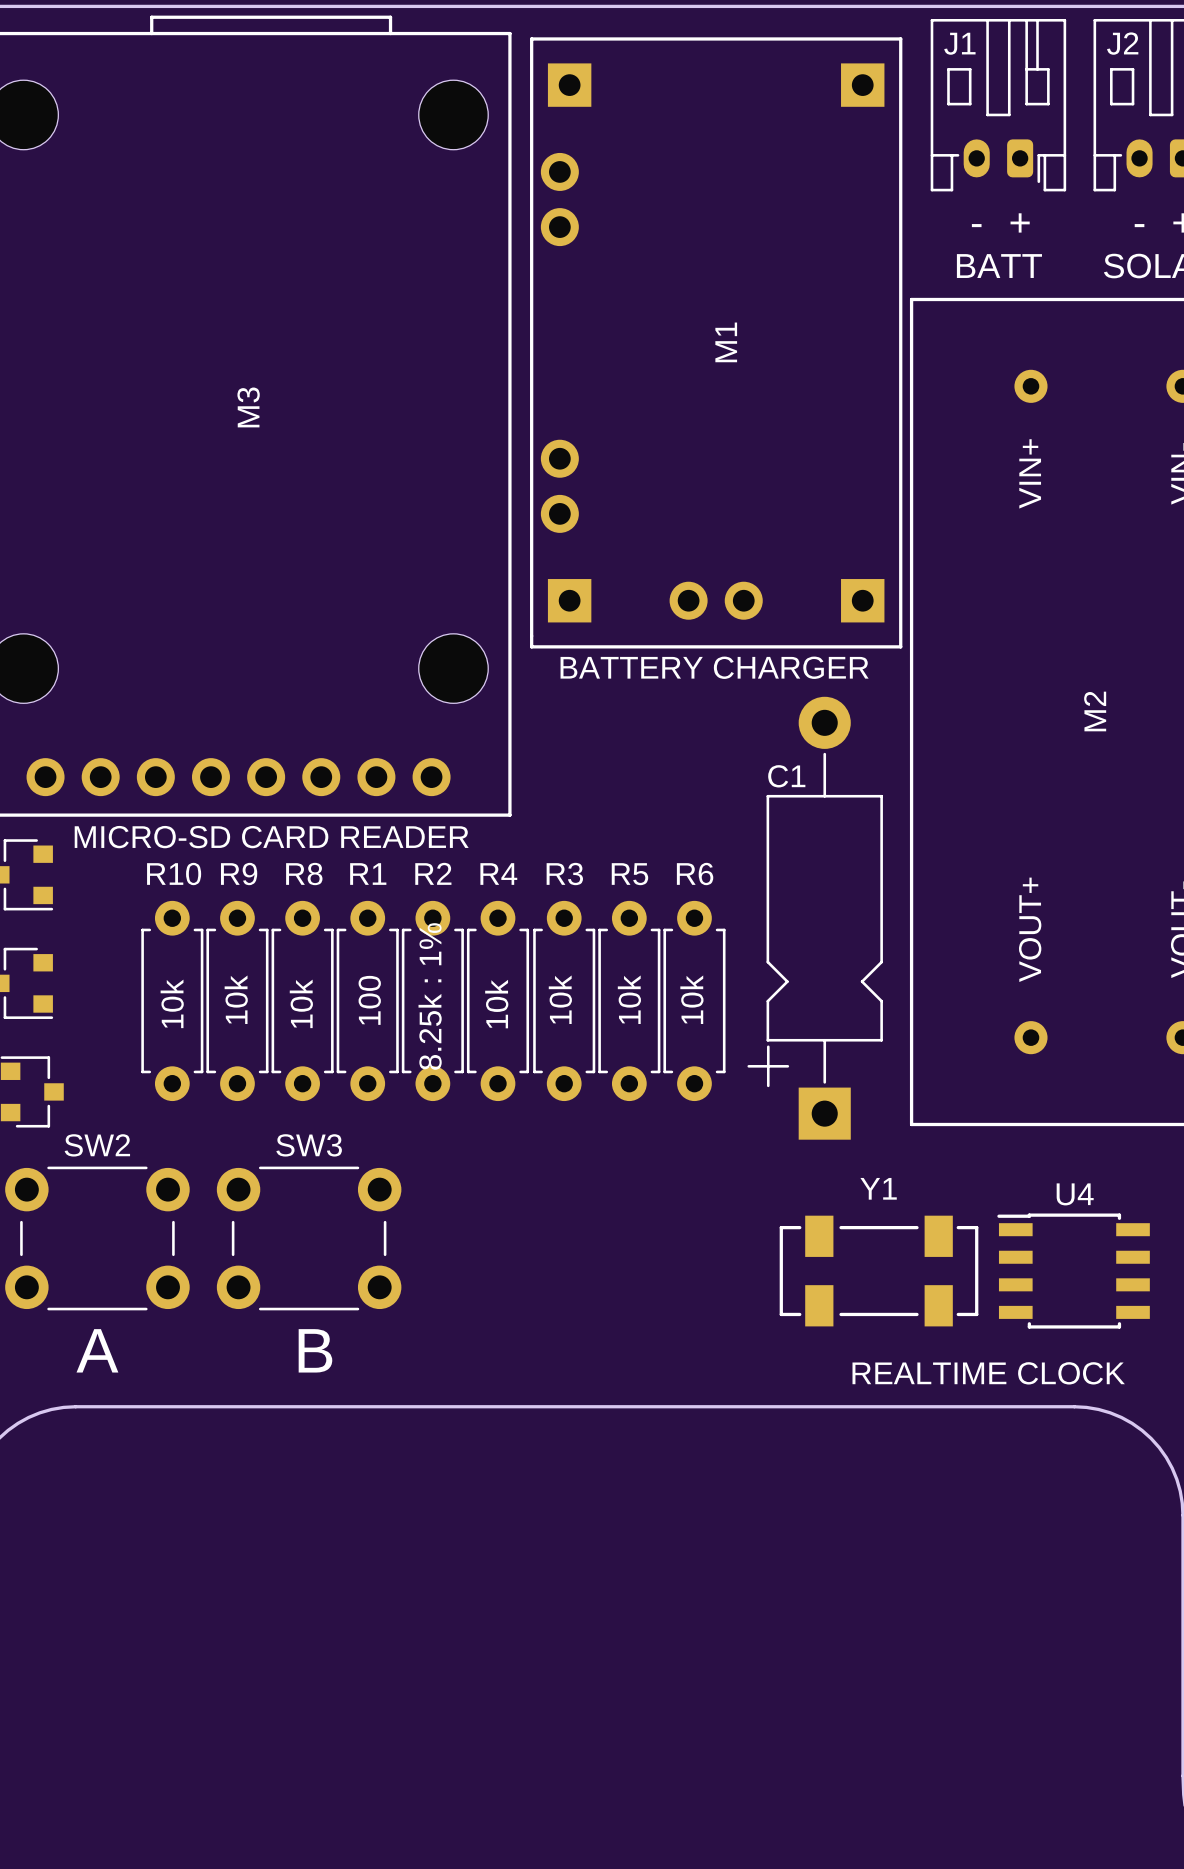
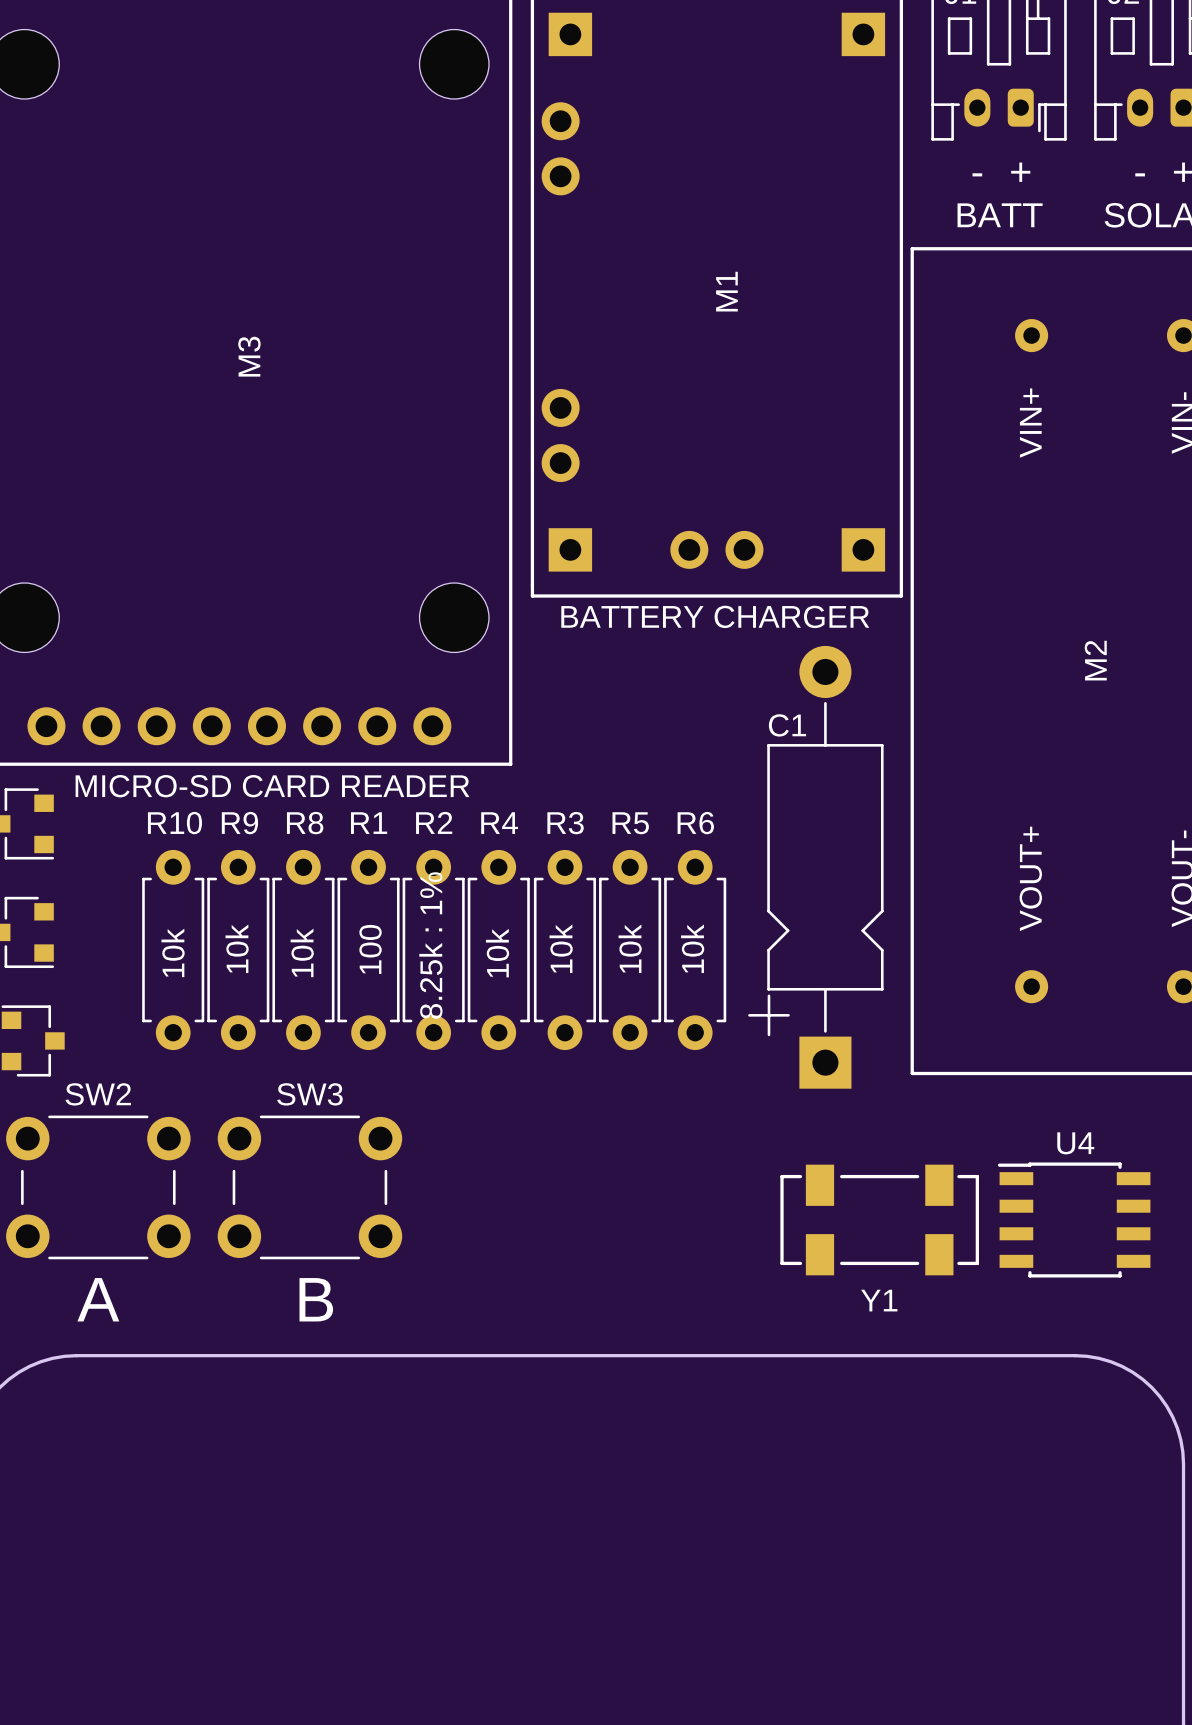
Y1 name position: Y1 (878, 1188) -> Y1 (879, 1300)
text: REALTIME CLOCK (988, 1373) -> none

